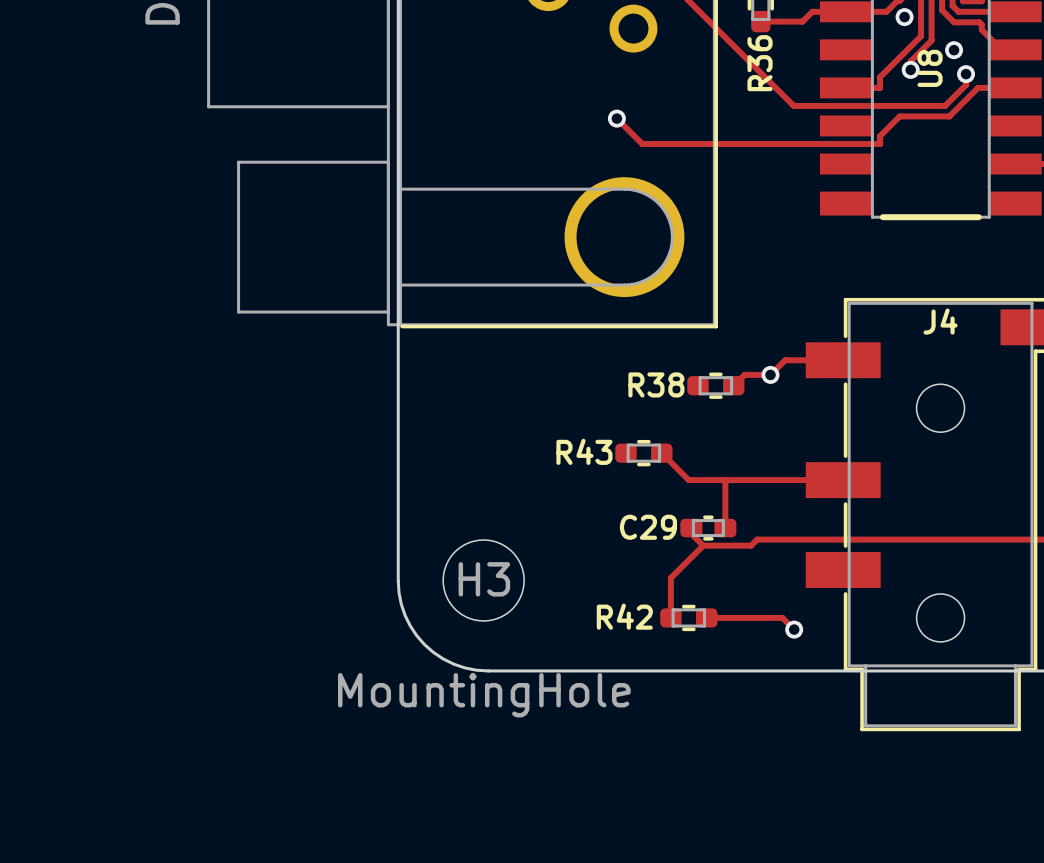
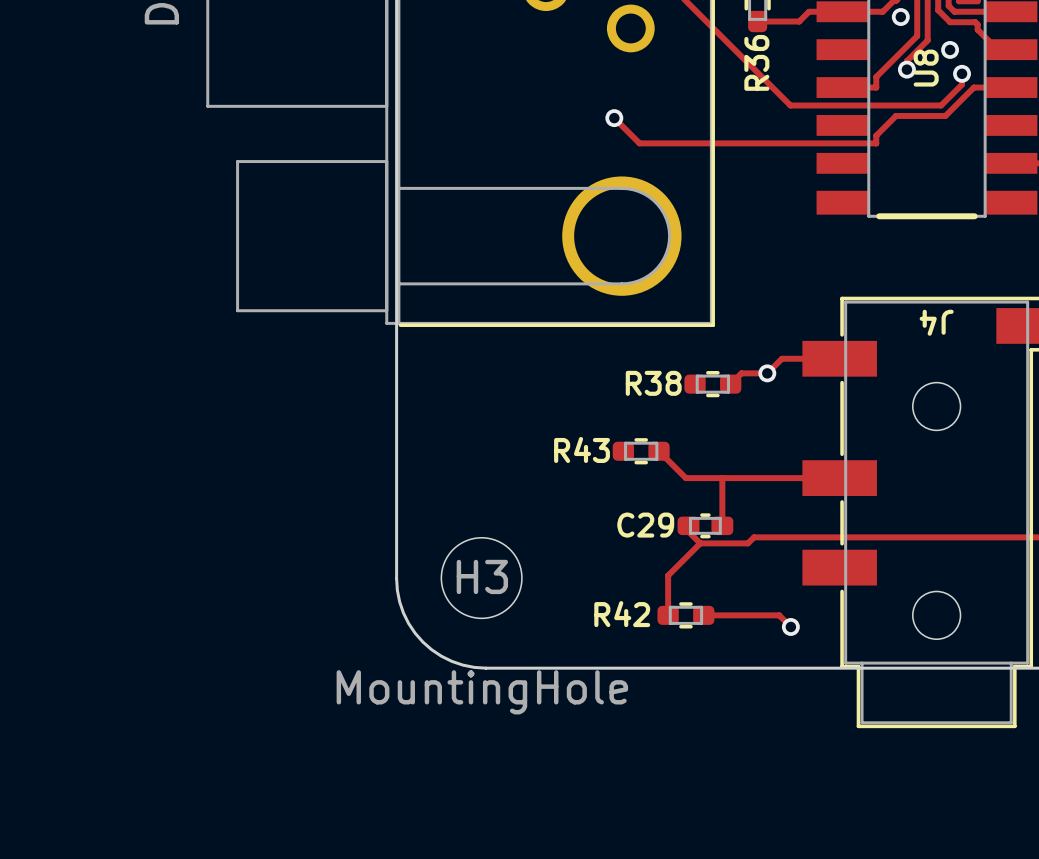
J4 name rotation: 0° (940, 321) -> 180° (936, 322)

